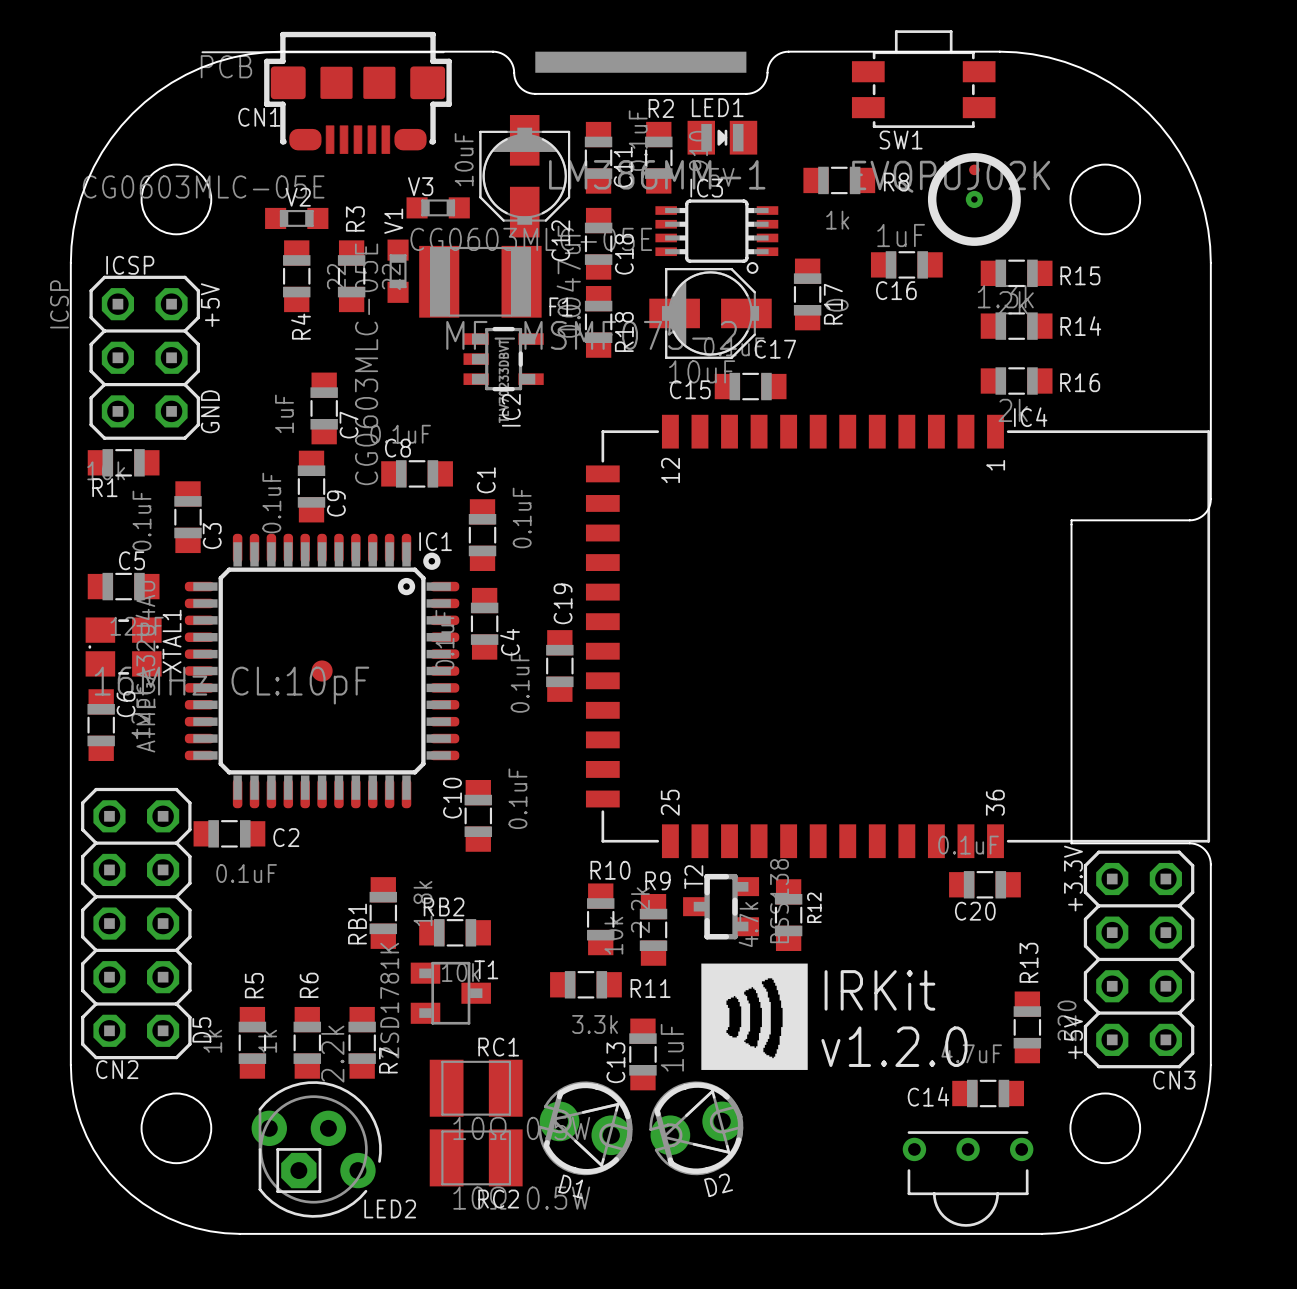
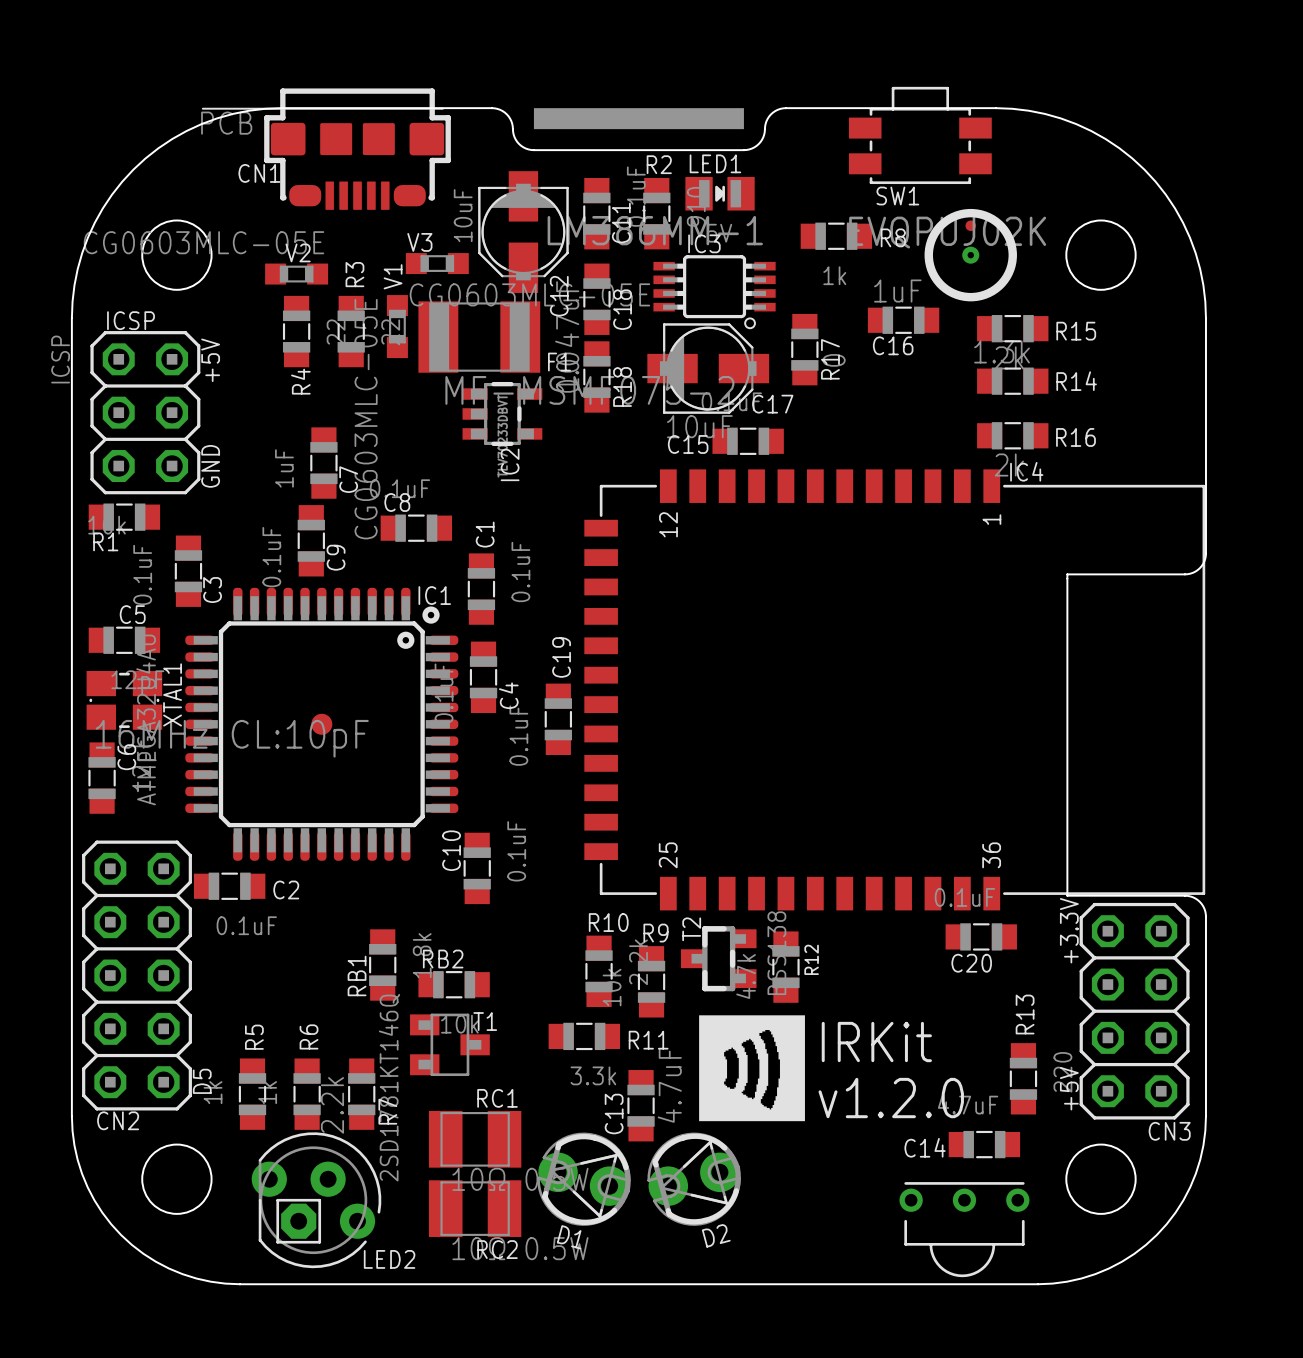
T1 value: 2SD1781K (389, 1000) -> 2SD1781KT146Q (389, 1087)
C13 value: 1uF (672, 1047) -> 4.7uF (669, 1085)

